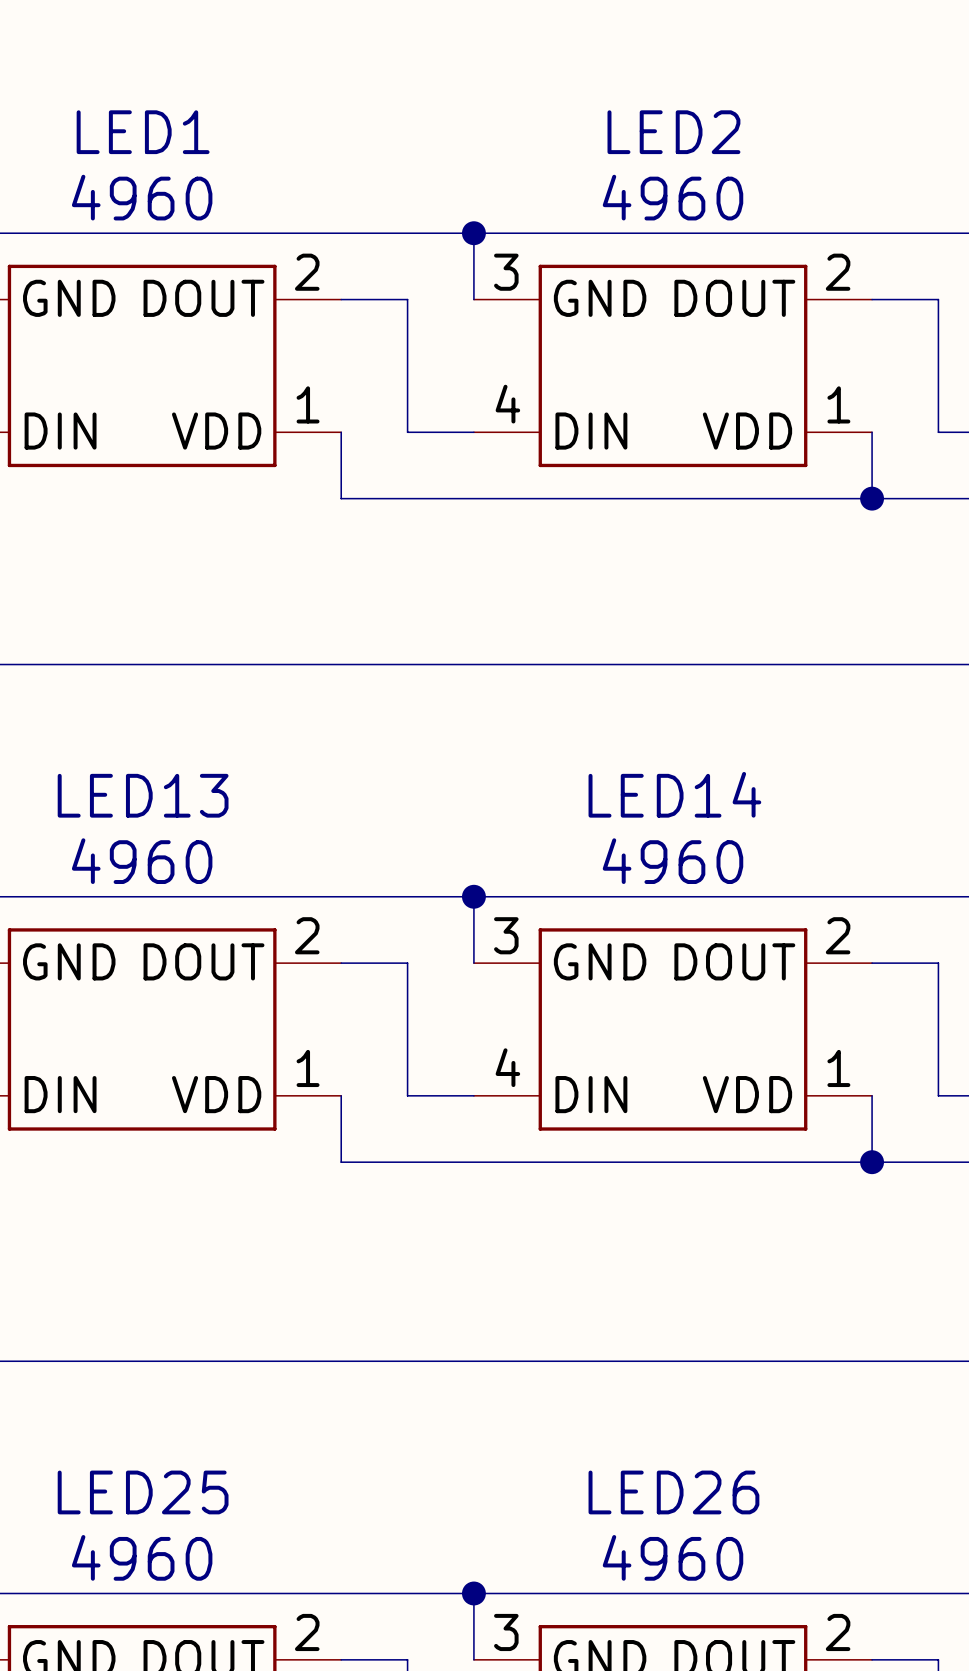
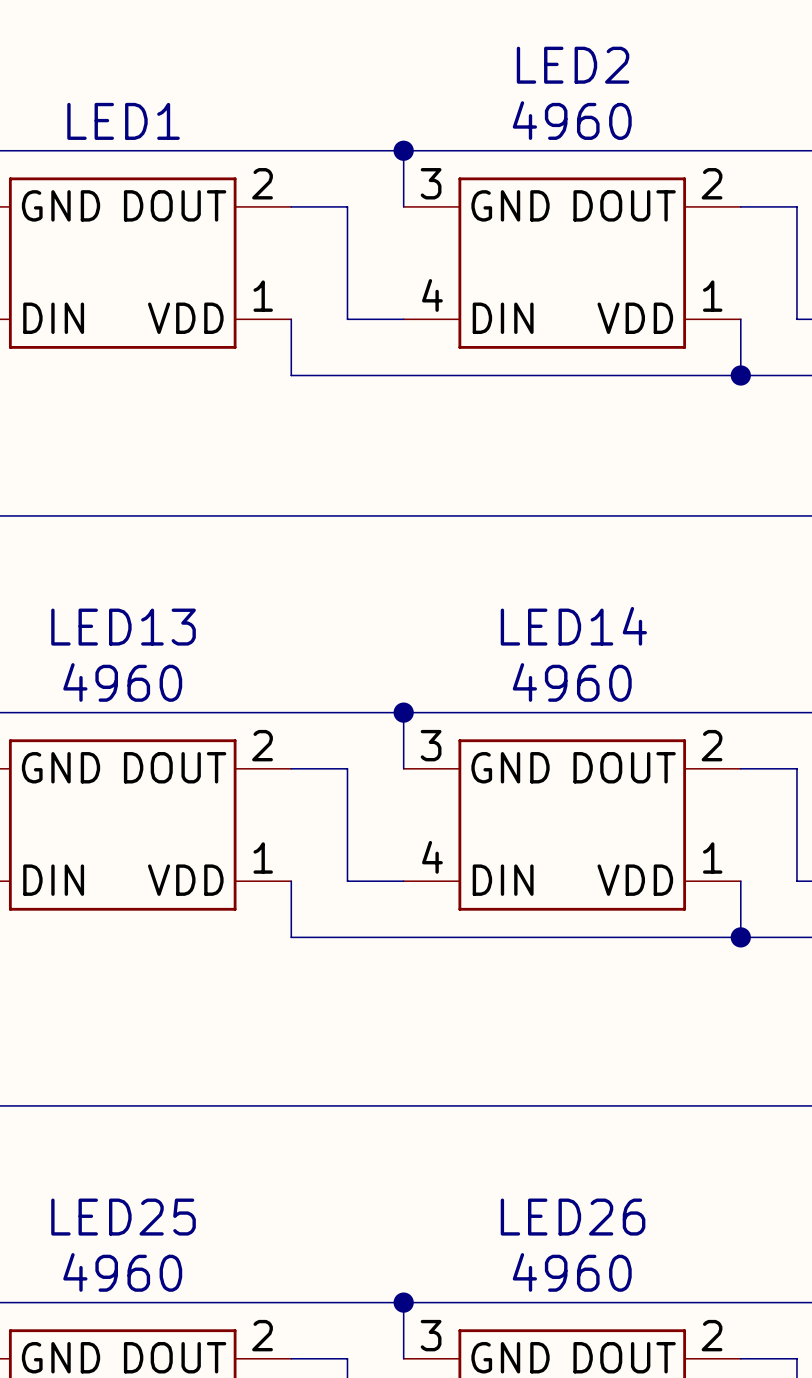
LED1 name position: LED1 (143, 132) -> LED1 (123, 121)
LED1 value: 4960 (142, 197) -> none

